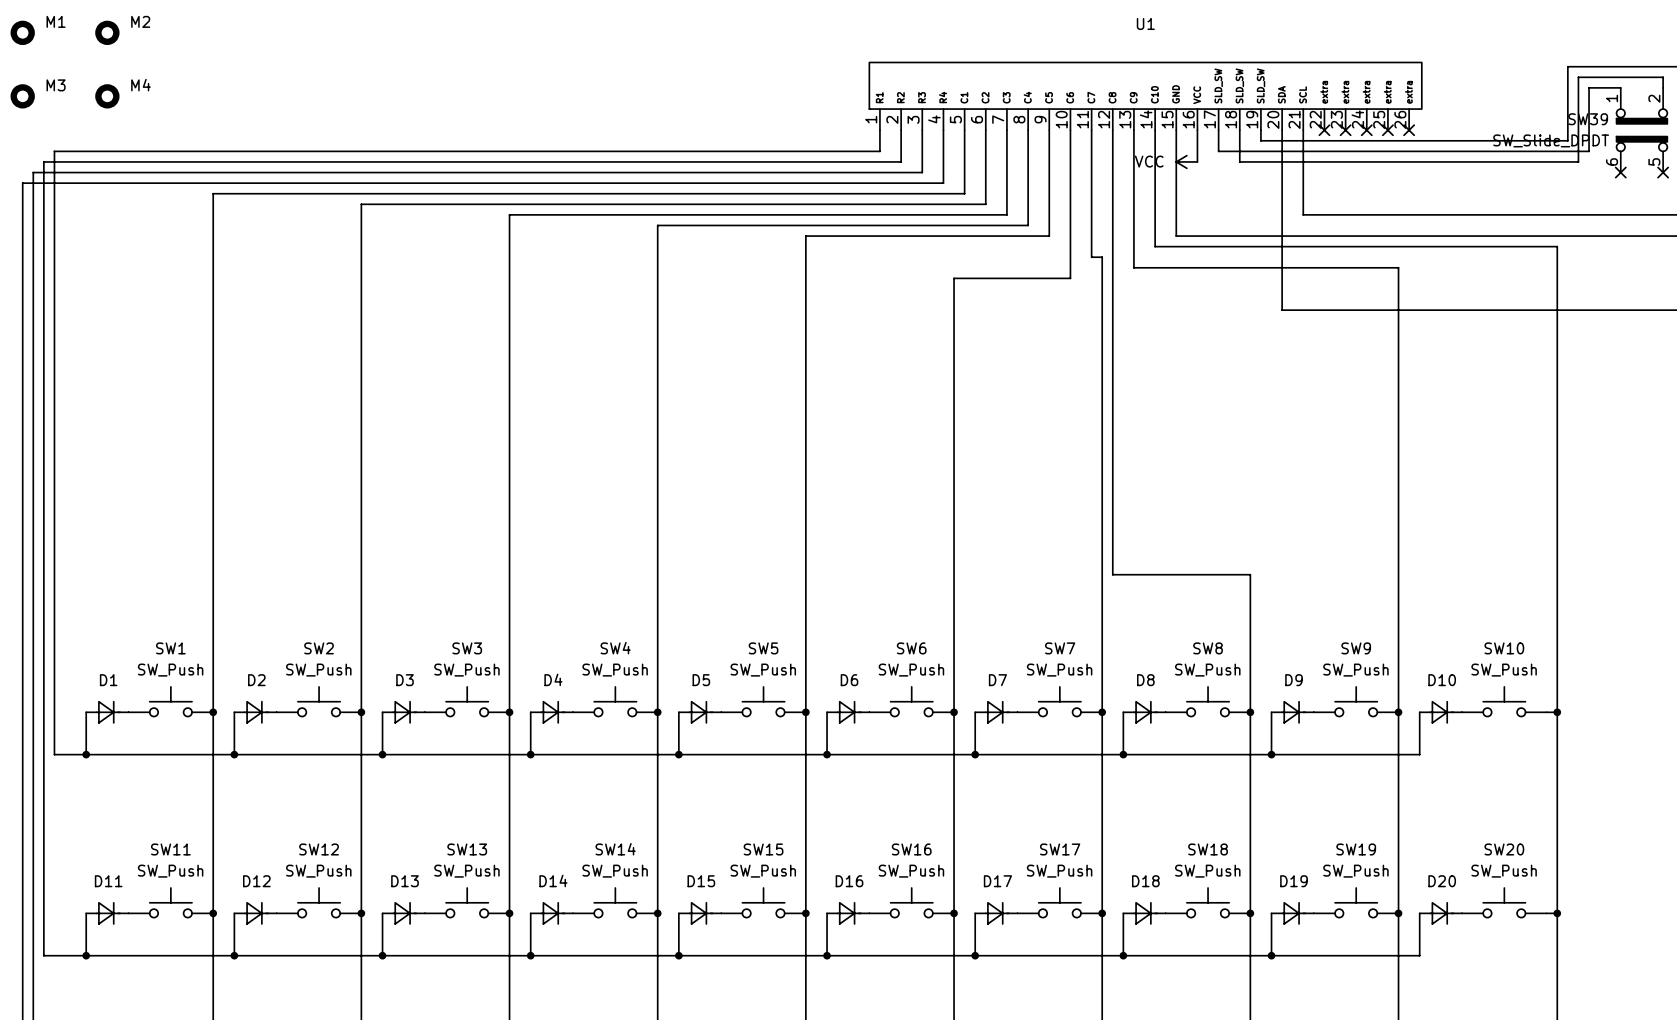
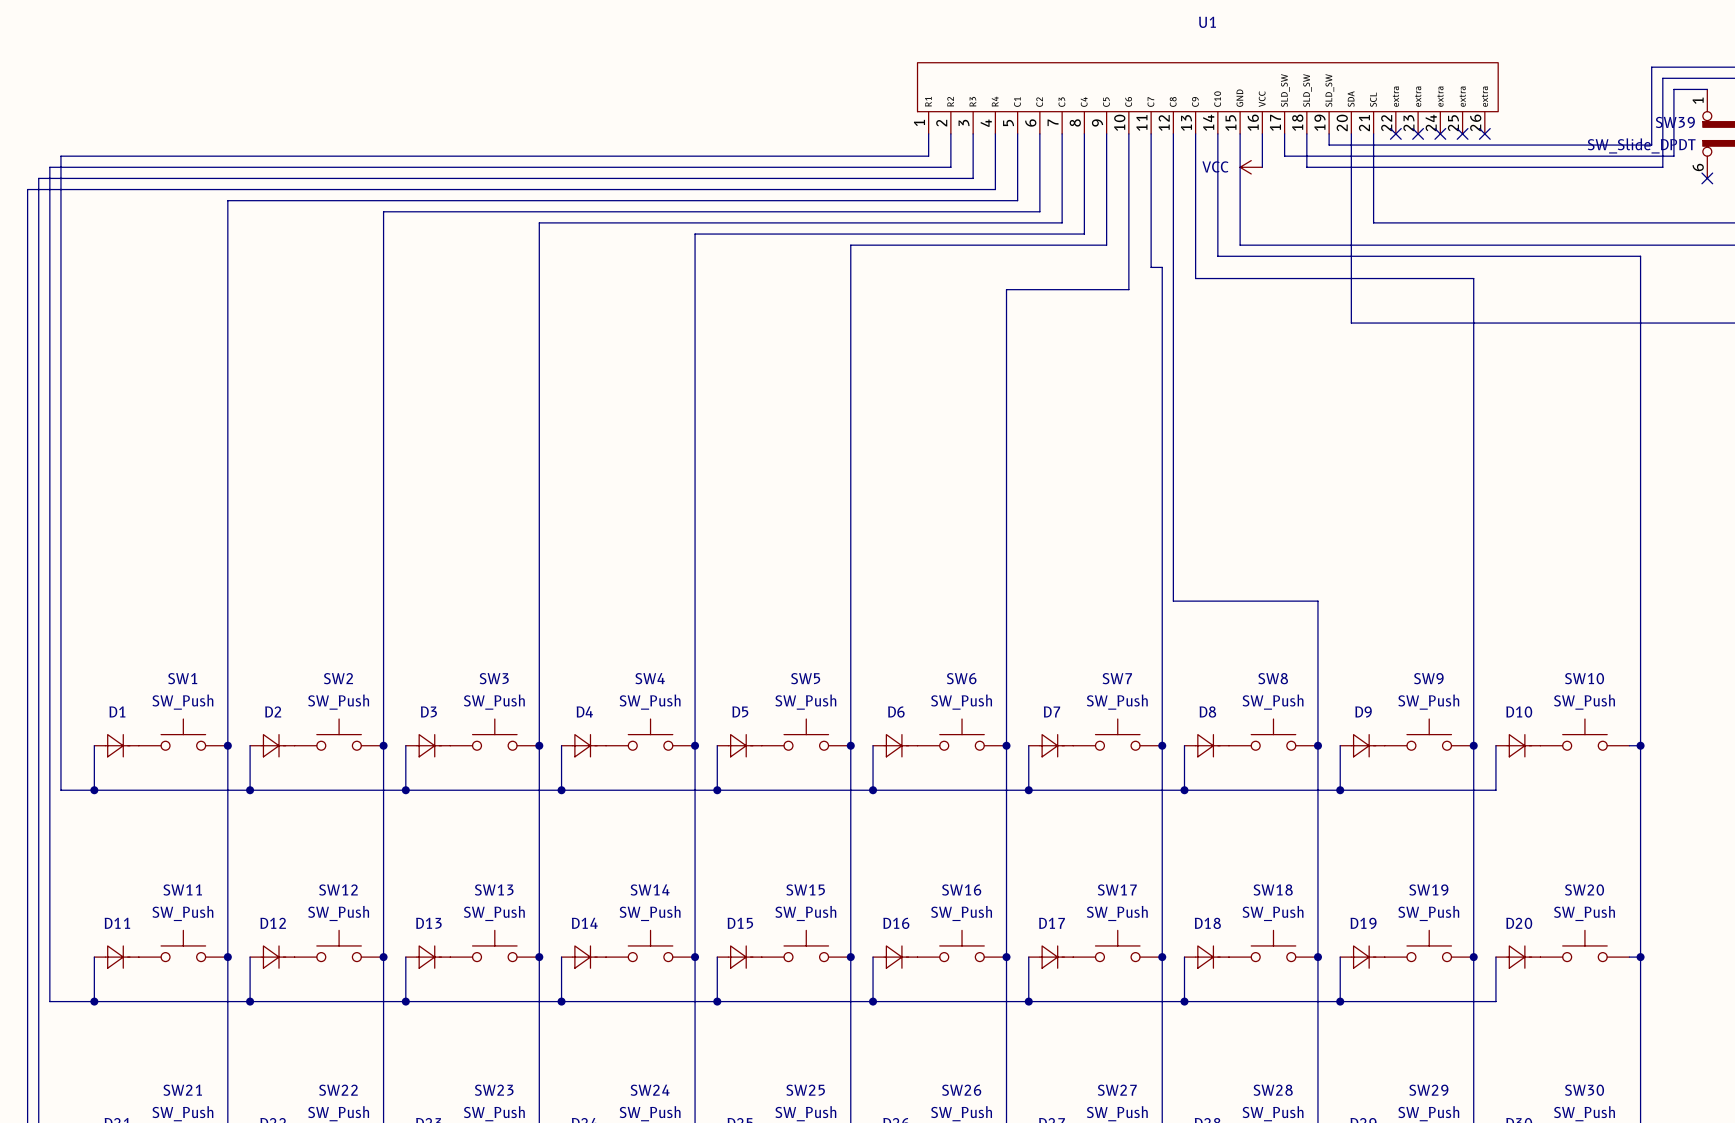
M1: (22, 32) -> none
M2: (107, 32) -> none
M3: (22, 96) -> none
M4: (107, 96) -> none

